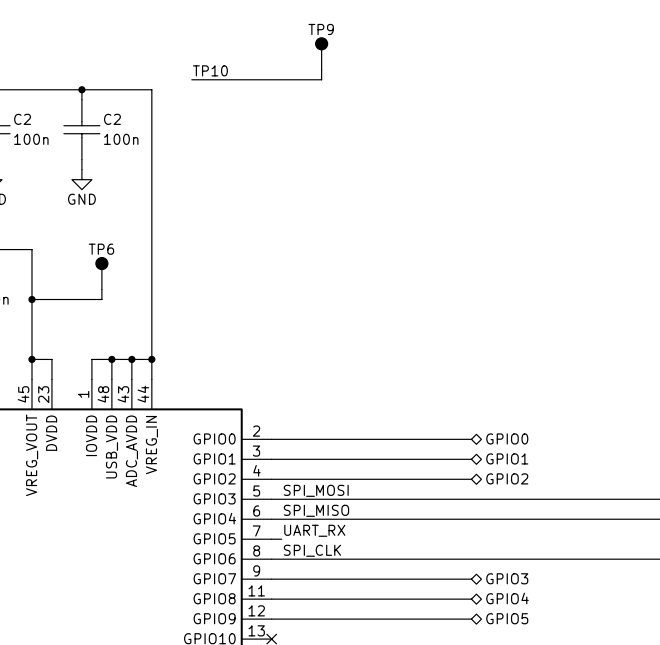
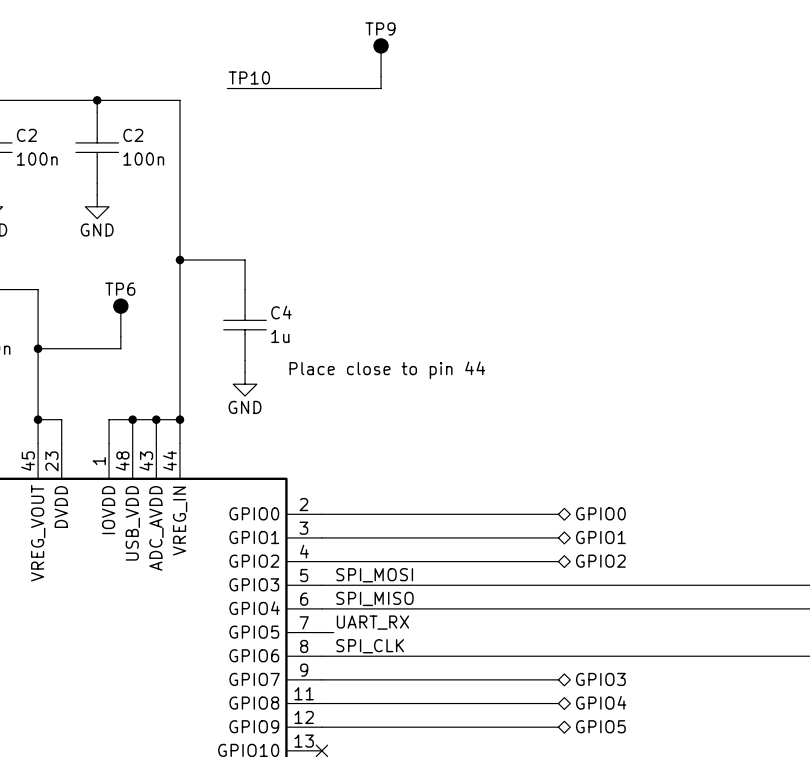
wire: none -> (179, 260) (245, 260) (245, 289)
junction: none -> (179, 260)
C4: none -> (245, 325)
wire: none -> (245, 360) (245, 372)
text: none -> Place close to pin 44 (387, 370)
power symbol: none -> GND (245, 384)

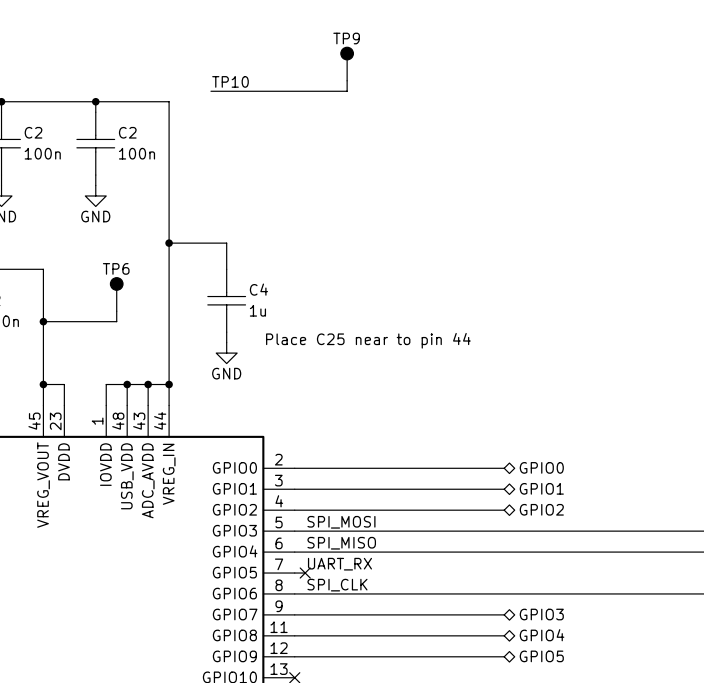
text: Place close to pin 44 (387, 370) -> Place C25 near to pin 44 (368, 340)
no-connect mark: none -> (305, 573)

